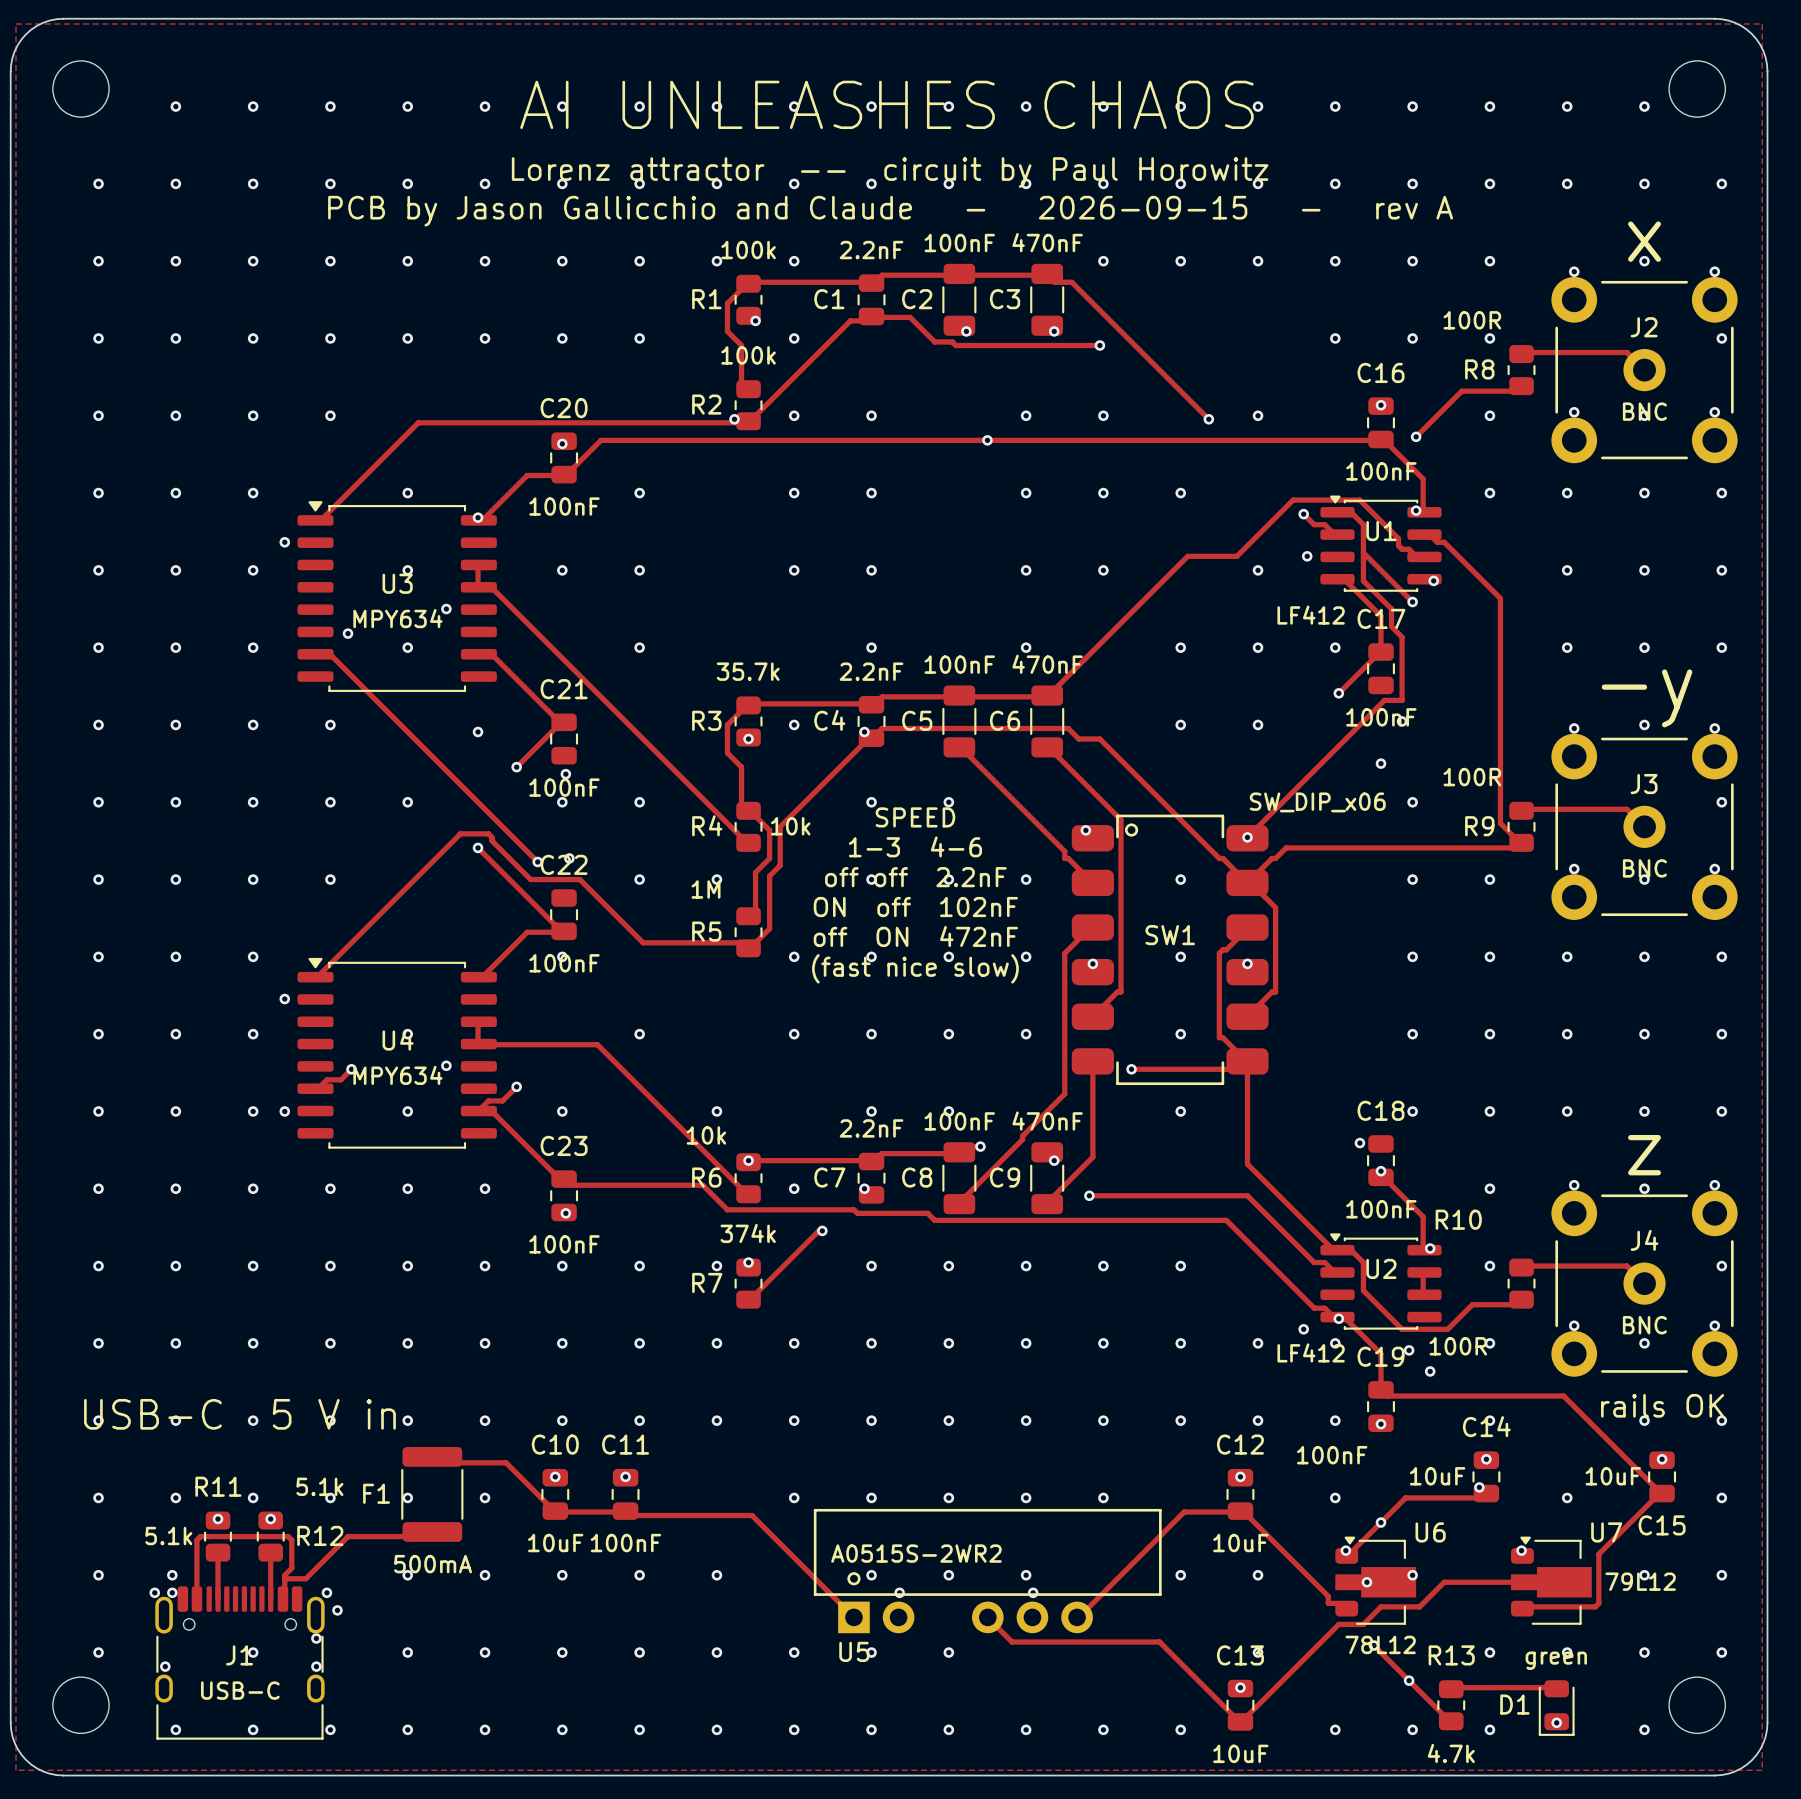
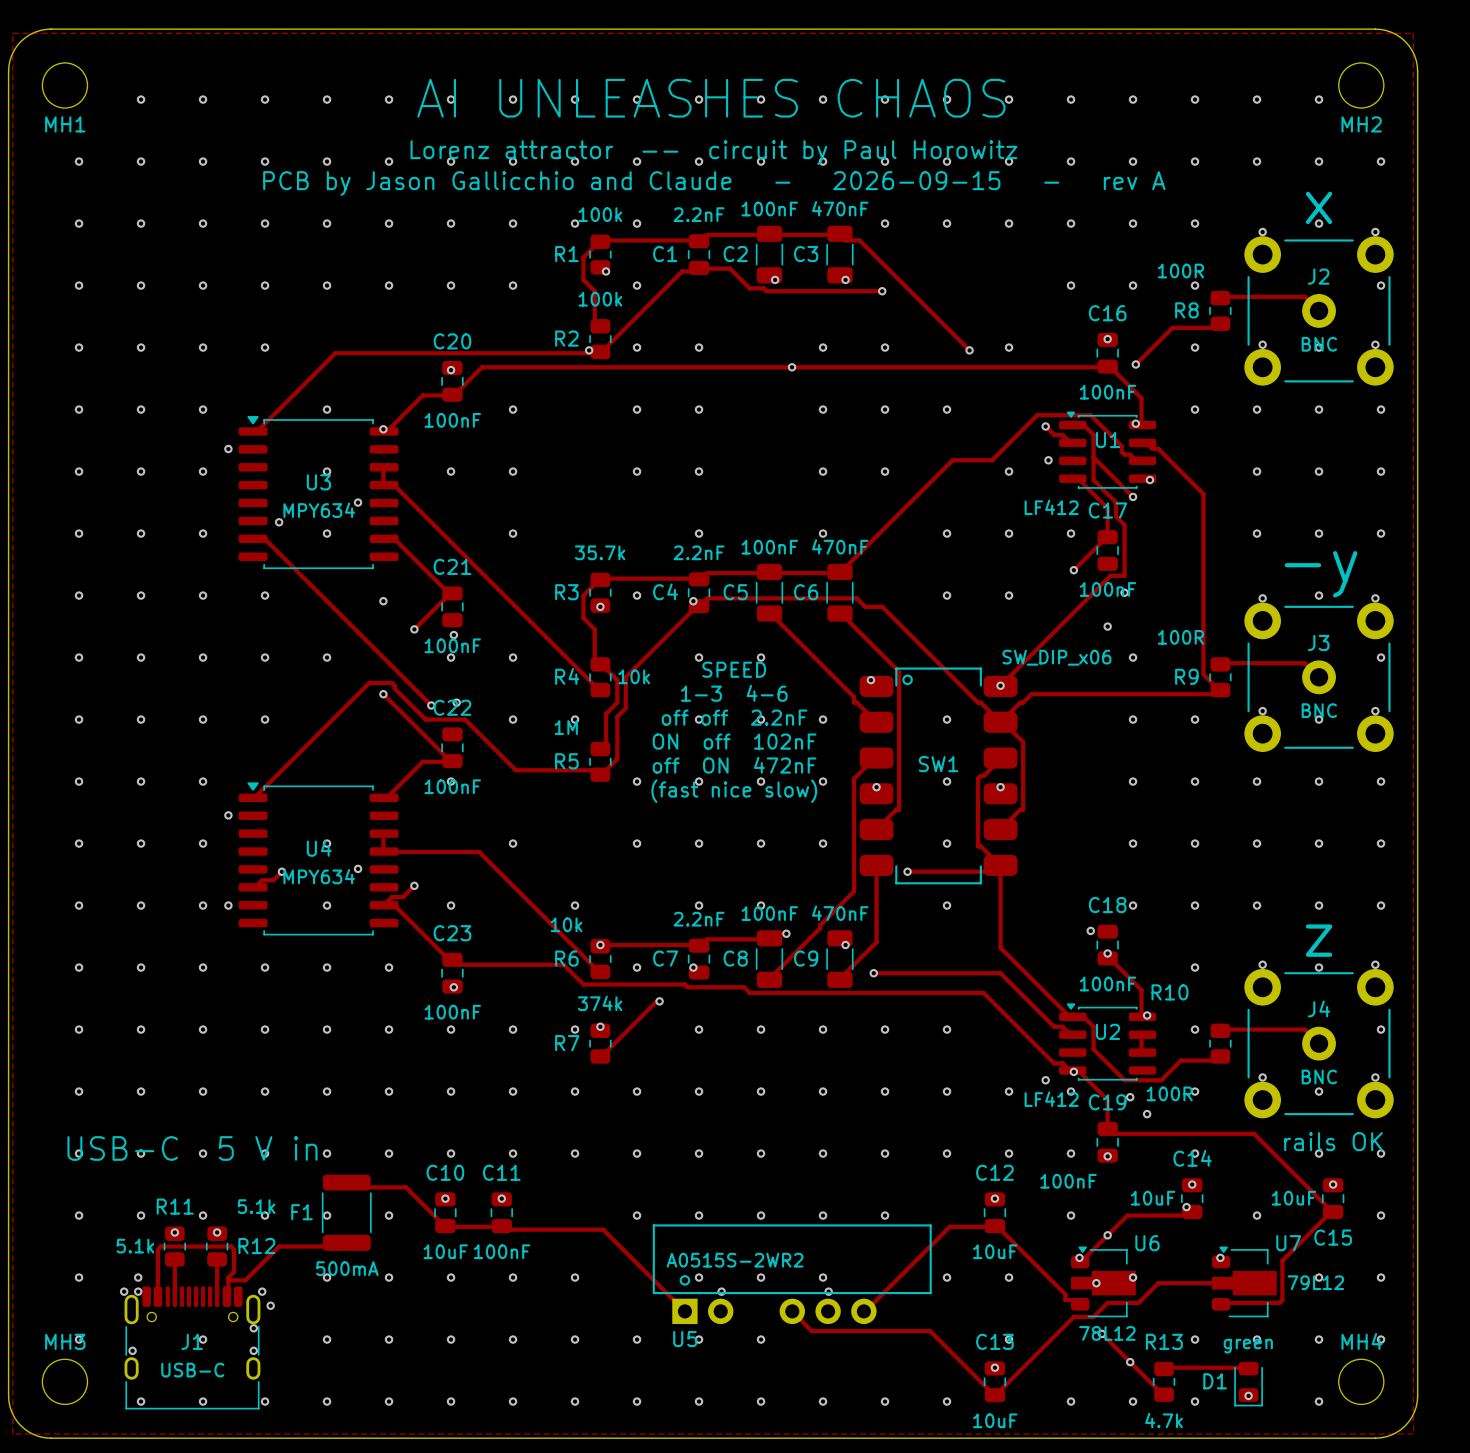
MH1 name: none -> MH1 (65, 124)
MH2 name: none -> MH2 (1361, 124)
MH4 name: none -> MH4 (1361, 1341)
MH3 name: none -> MH3 (65, 1341)

